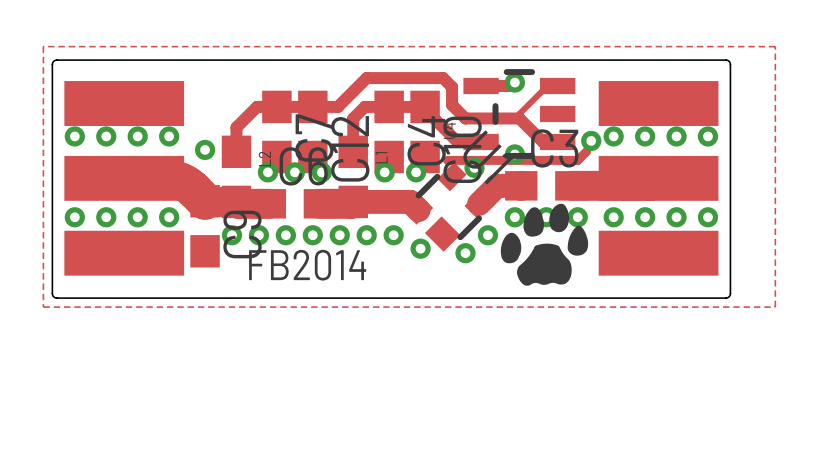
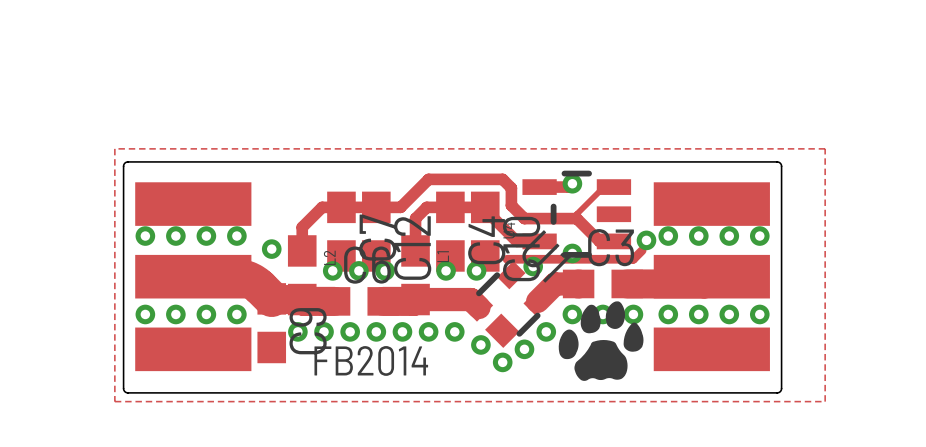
via: none -> (502, 362)

